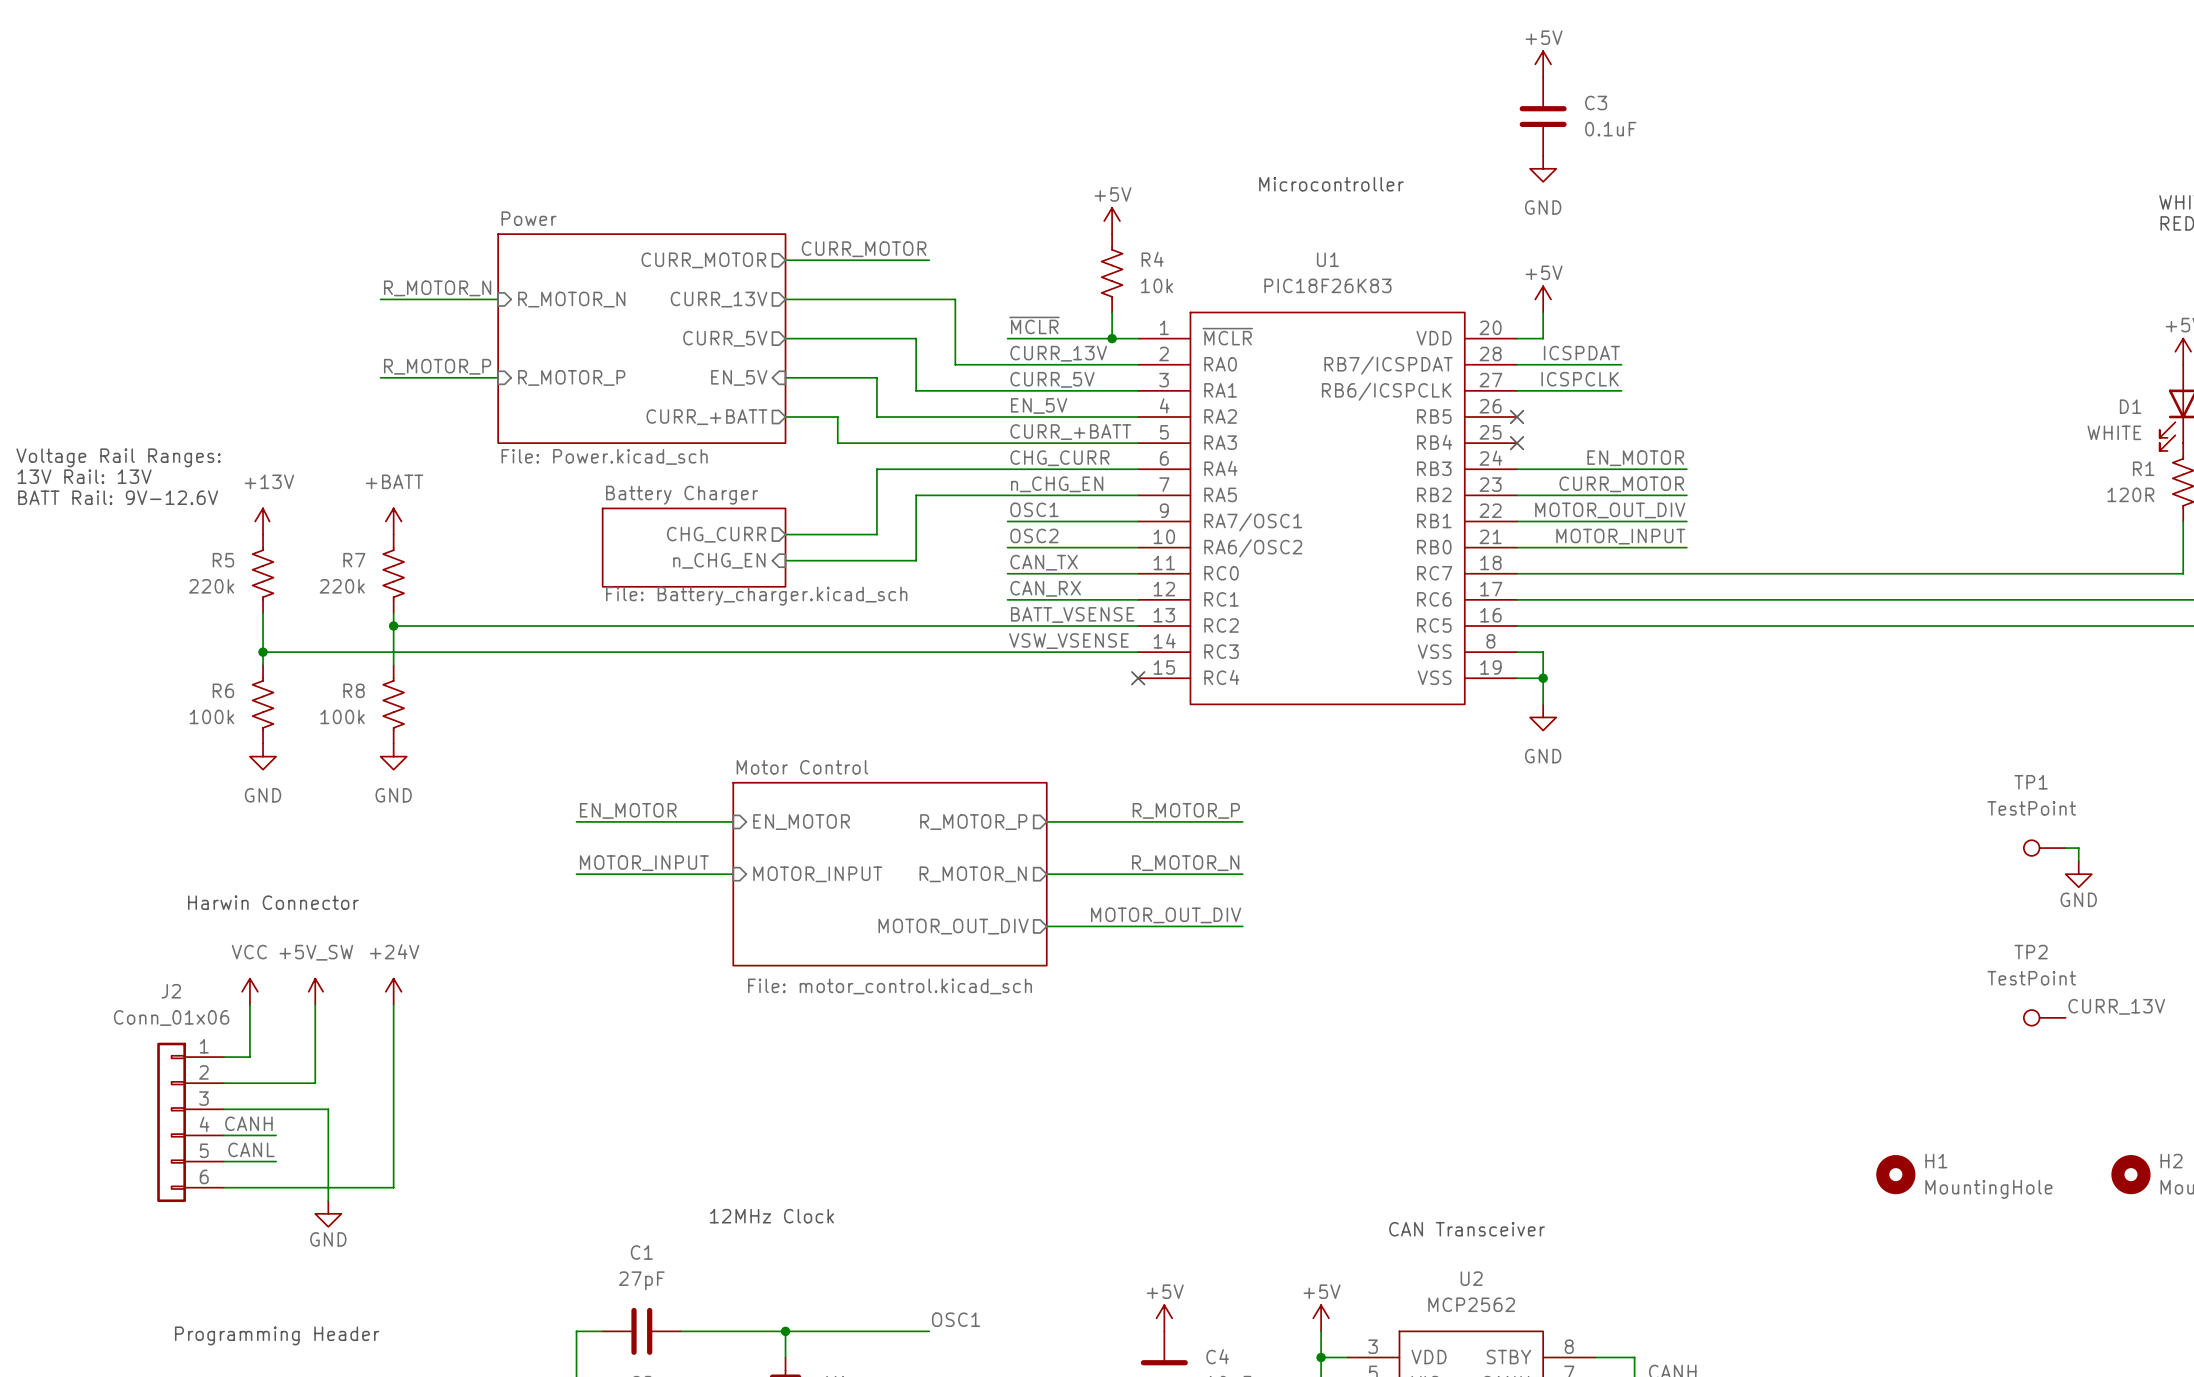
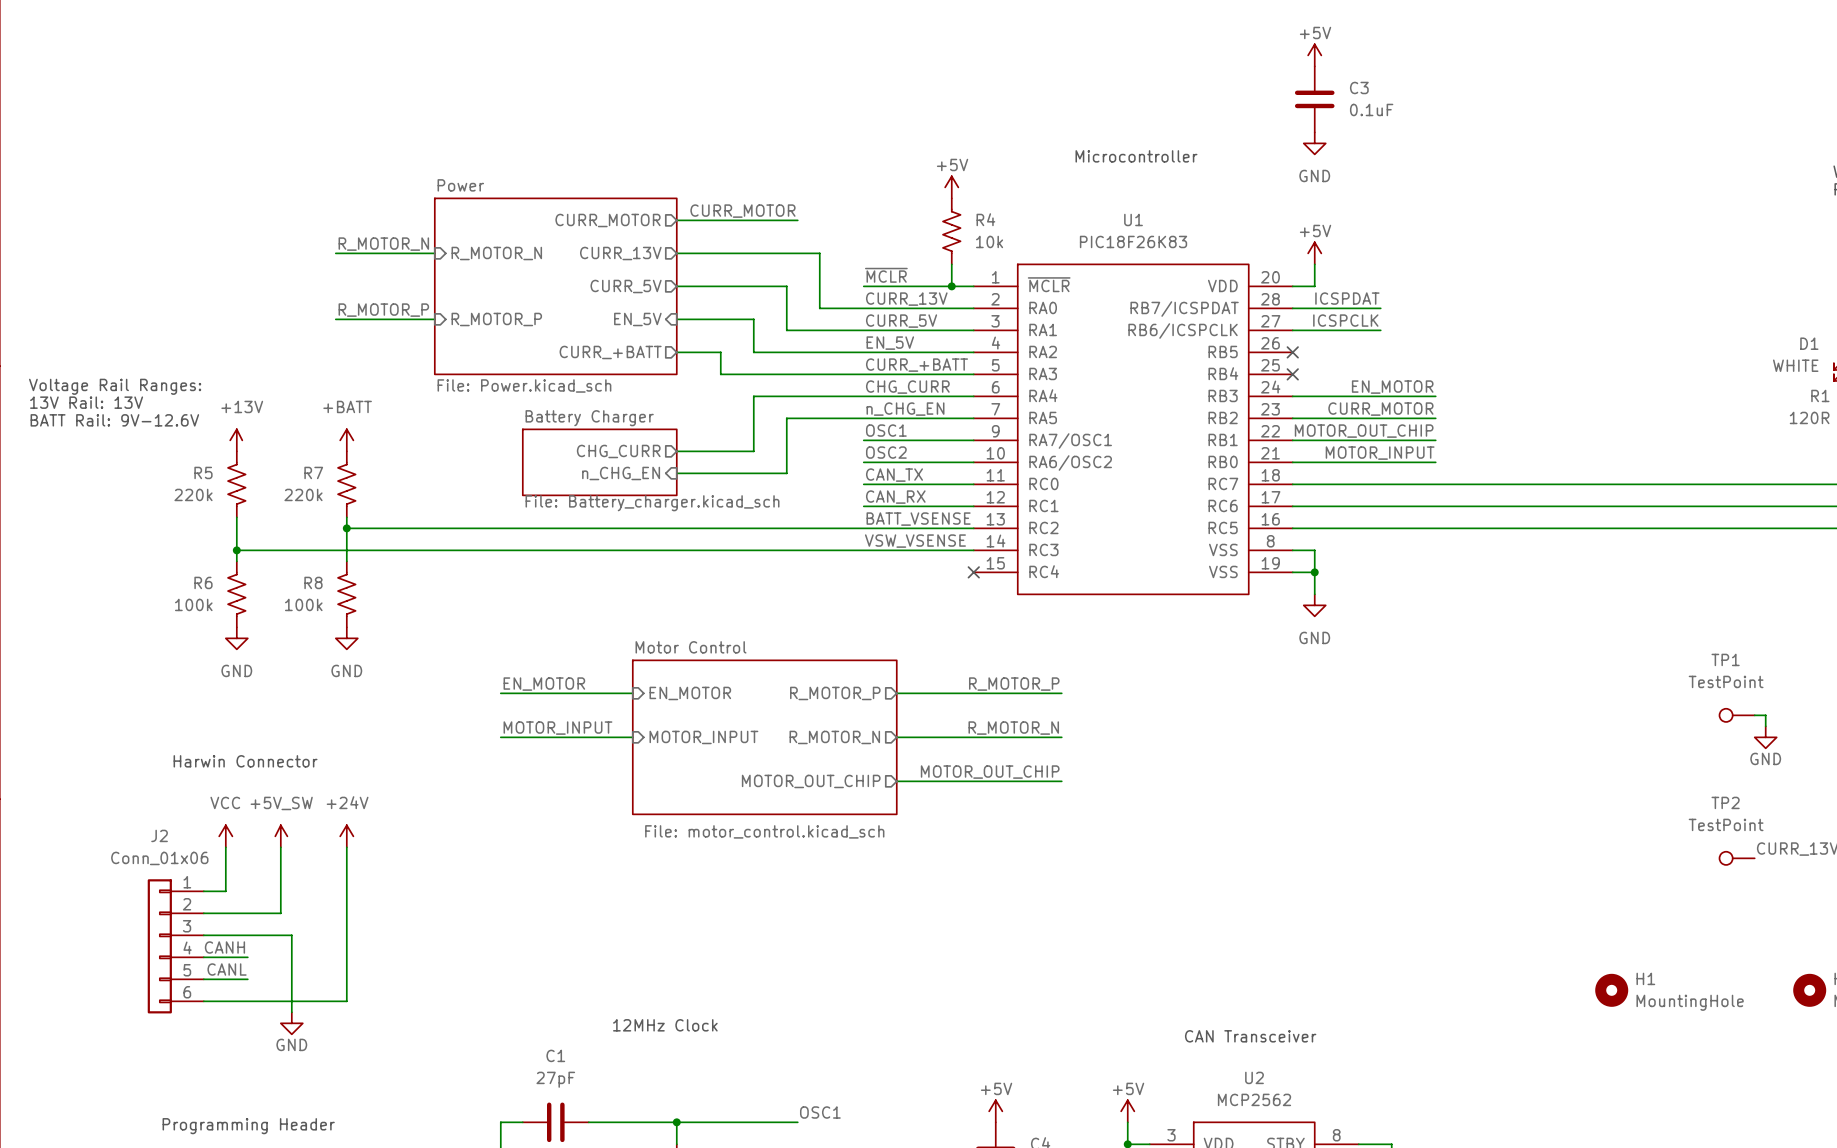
label: MOTOR_OUT_DIV (1610, 510) -> MOTOR_OUT_CHIP (1364, 431)
label: MOTOR_OUT_DIV (1166, 915) -> MOTOR_OUT_CHIP (990, 772)
sheet pin: MOTOR_OUT_DIV (953, 926) -> MOTOR_OUT_CHIP (811, 781)

